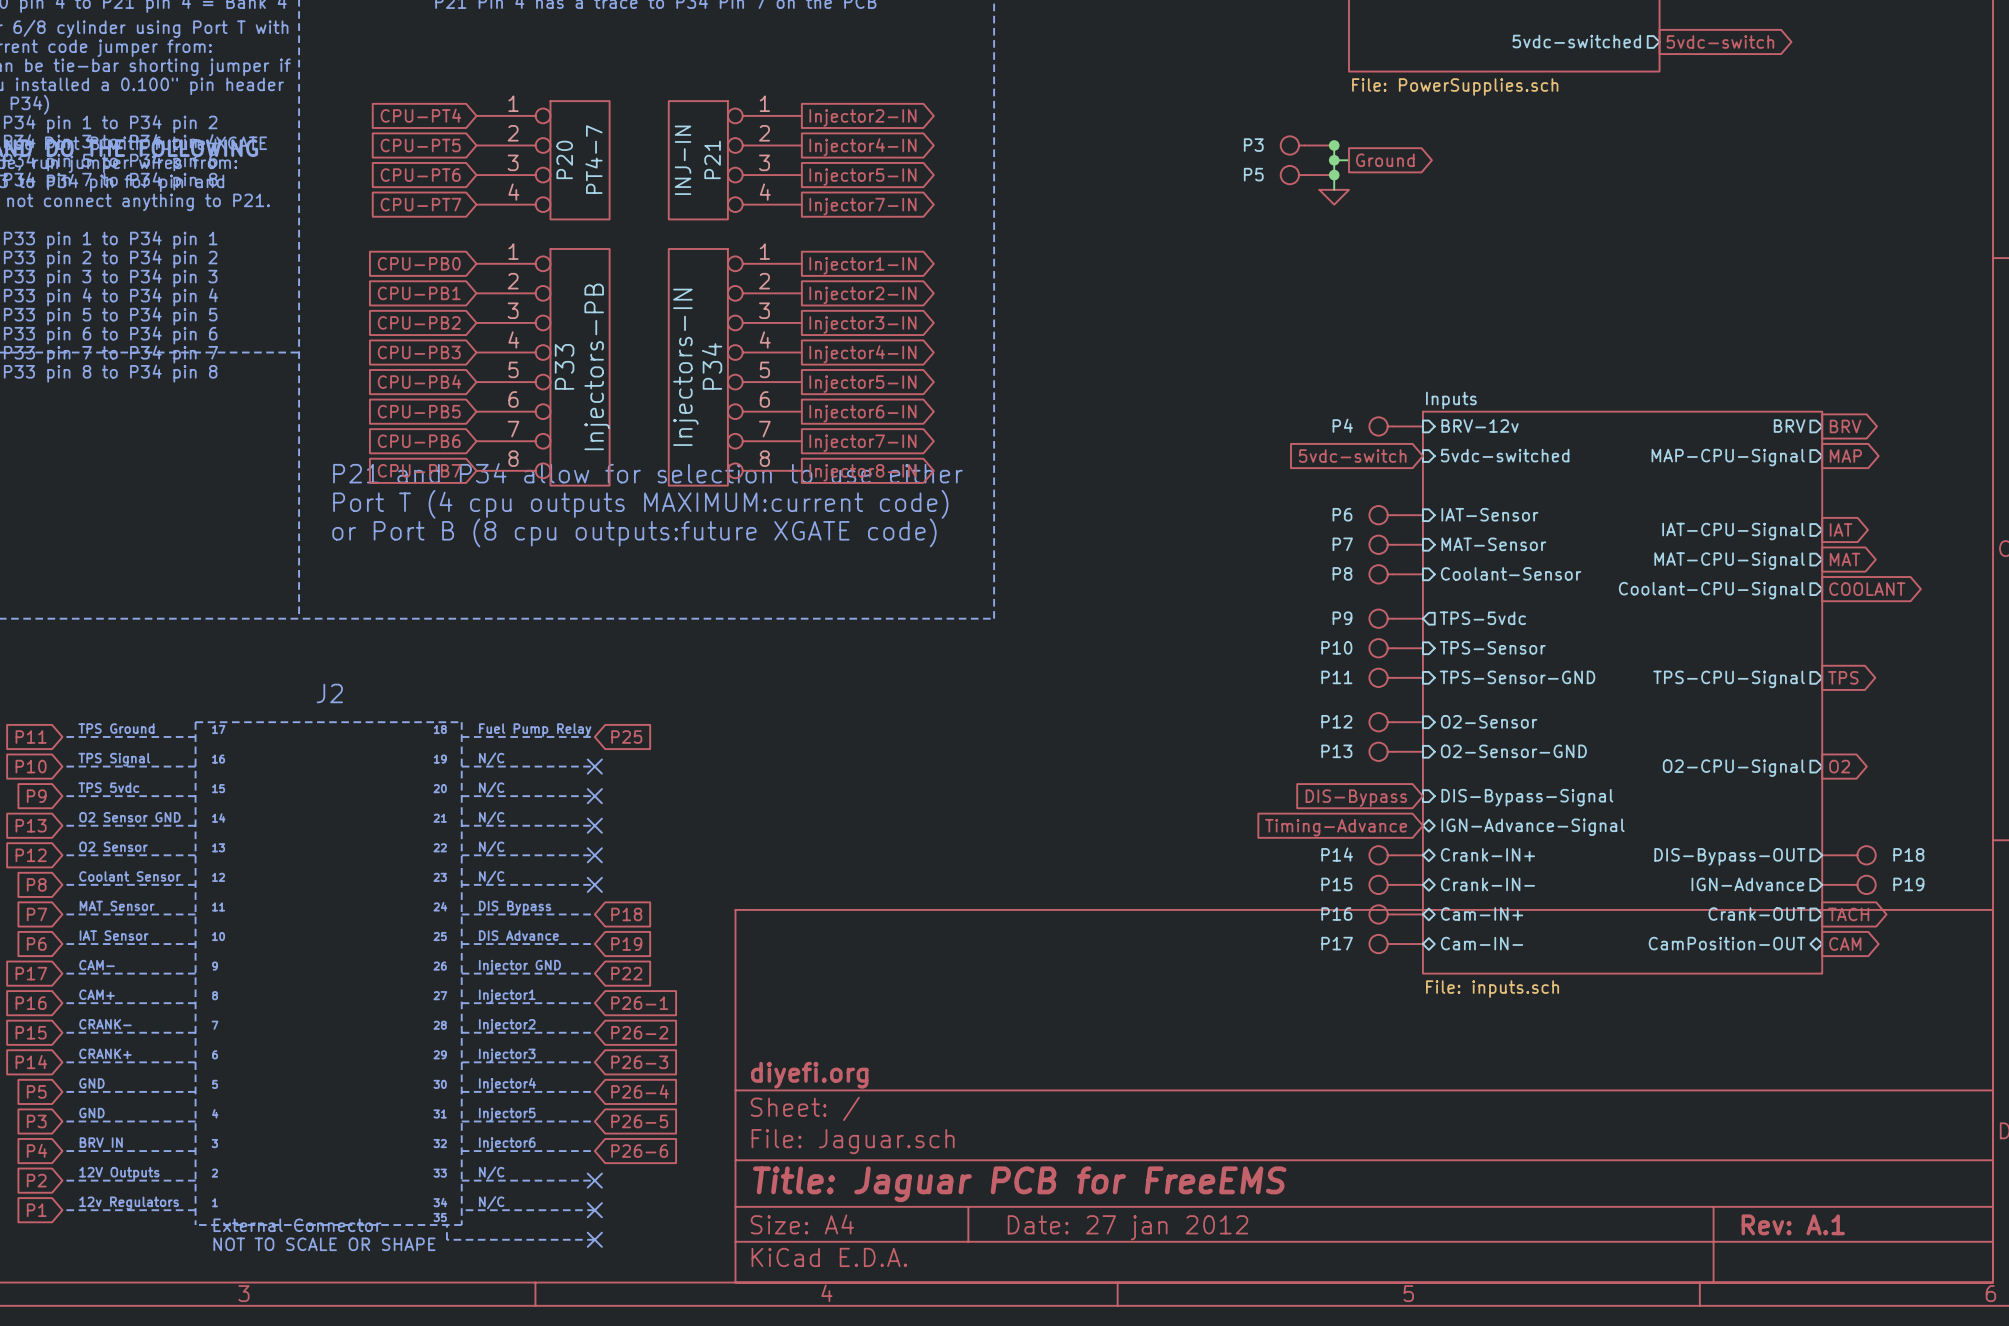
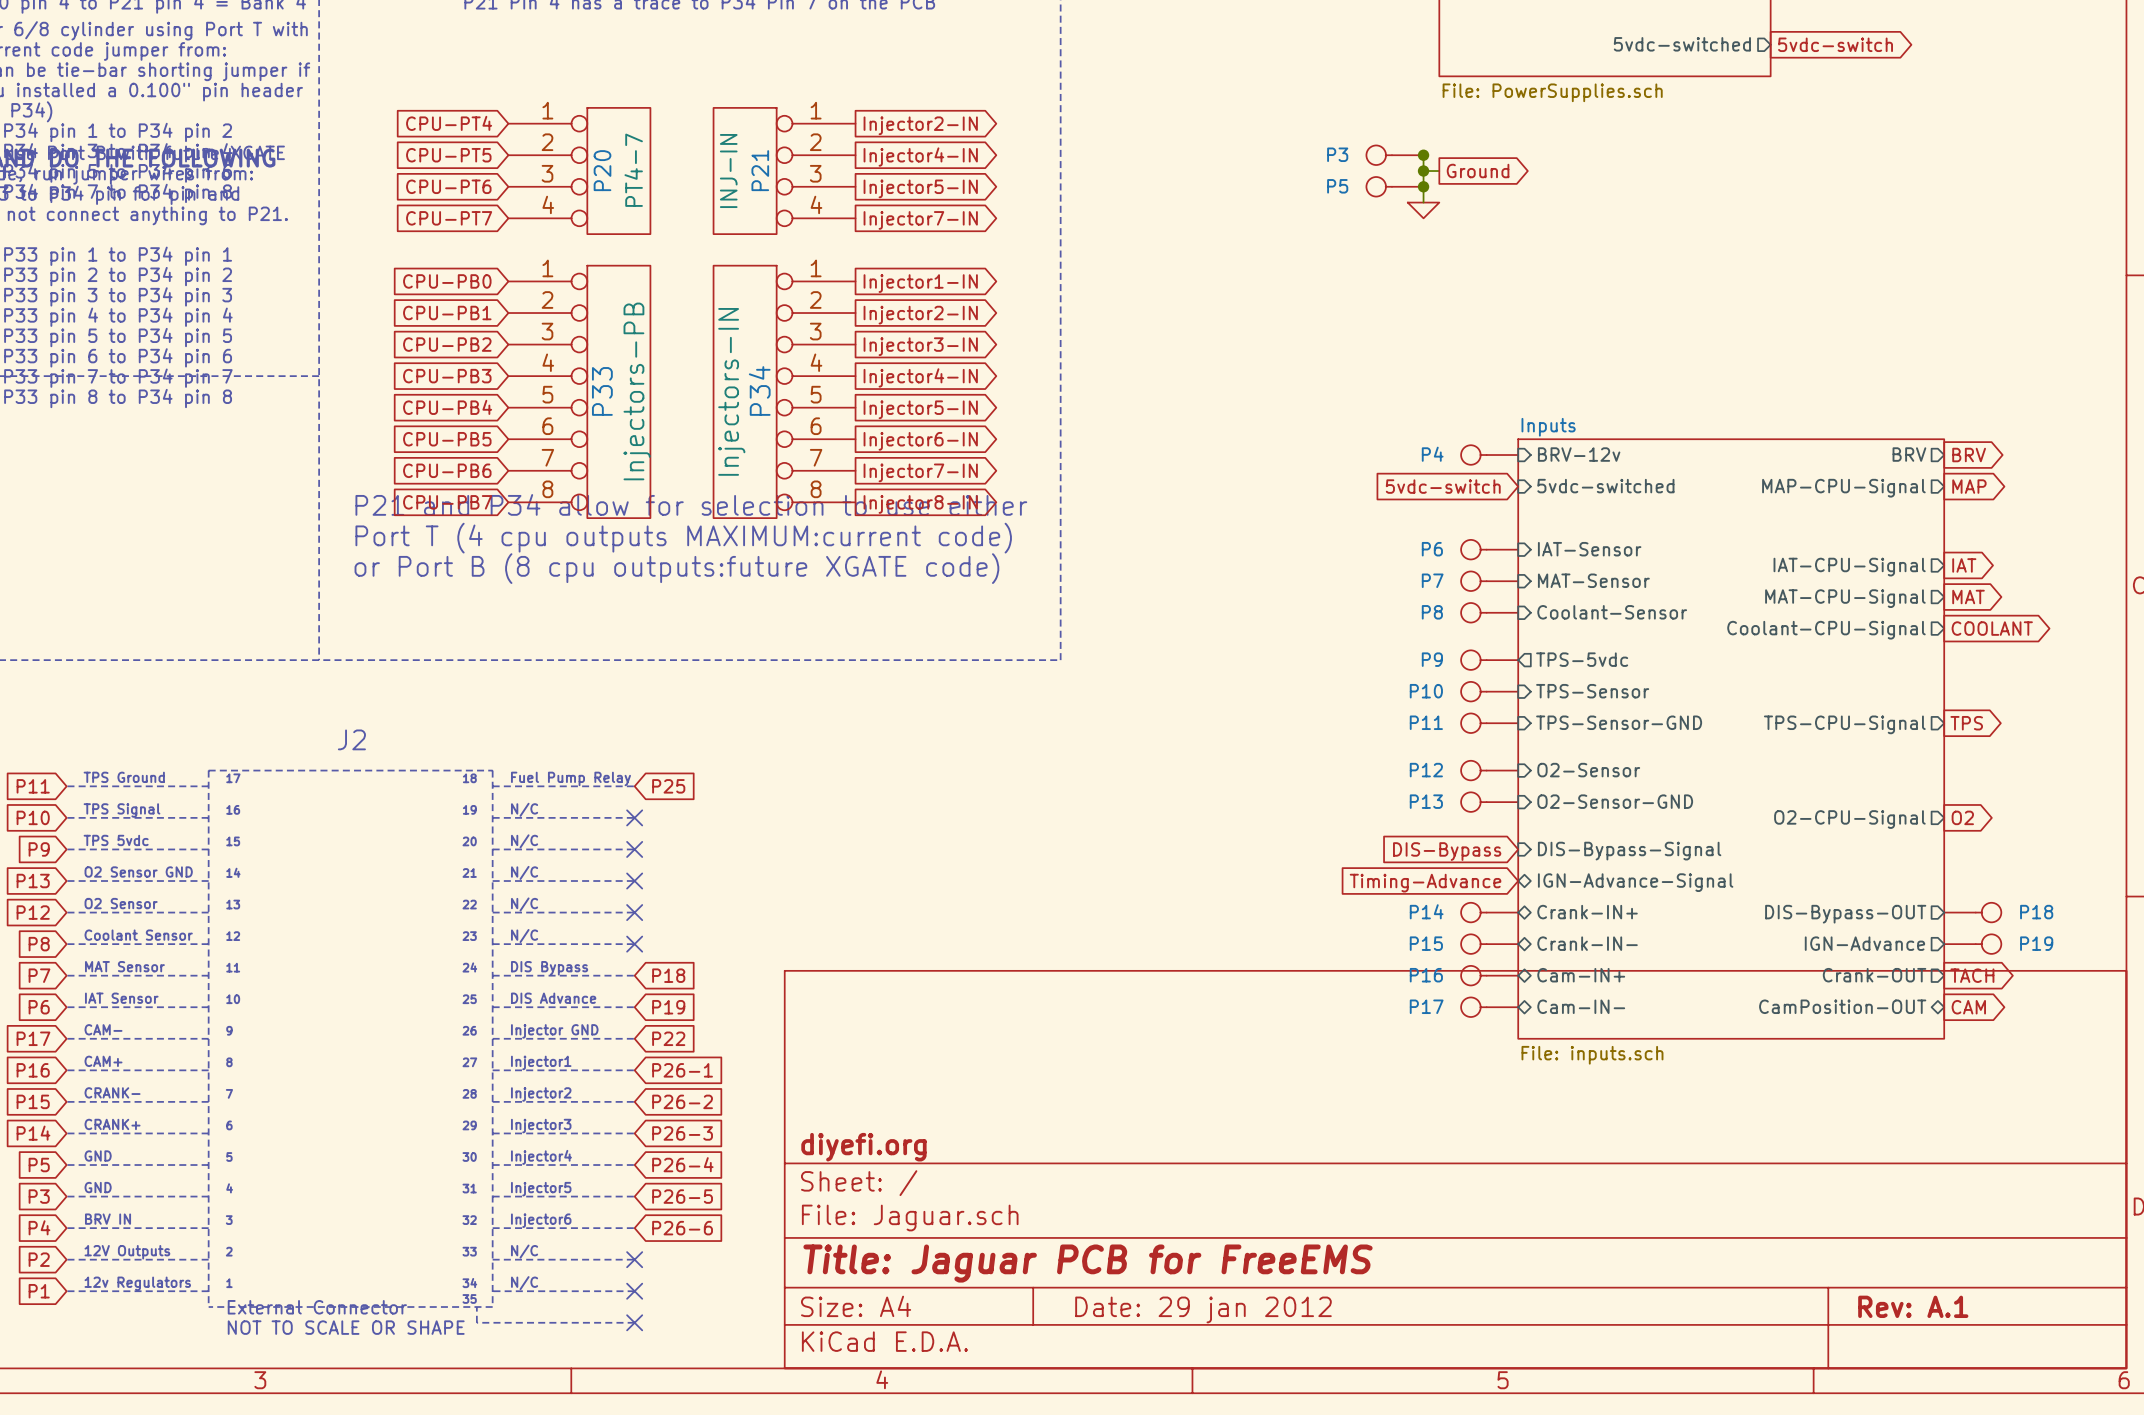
title block: Date: 27 jan 2012 (1127, 1227) -> Date: 29 jan 2012 (1203, 1309)

